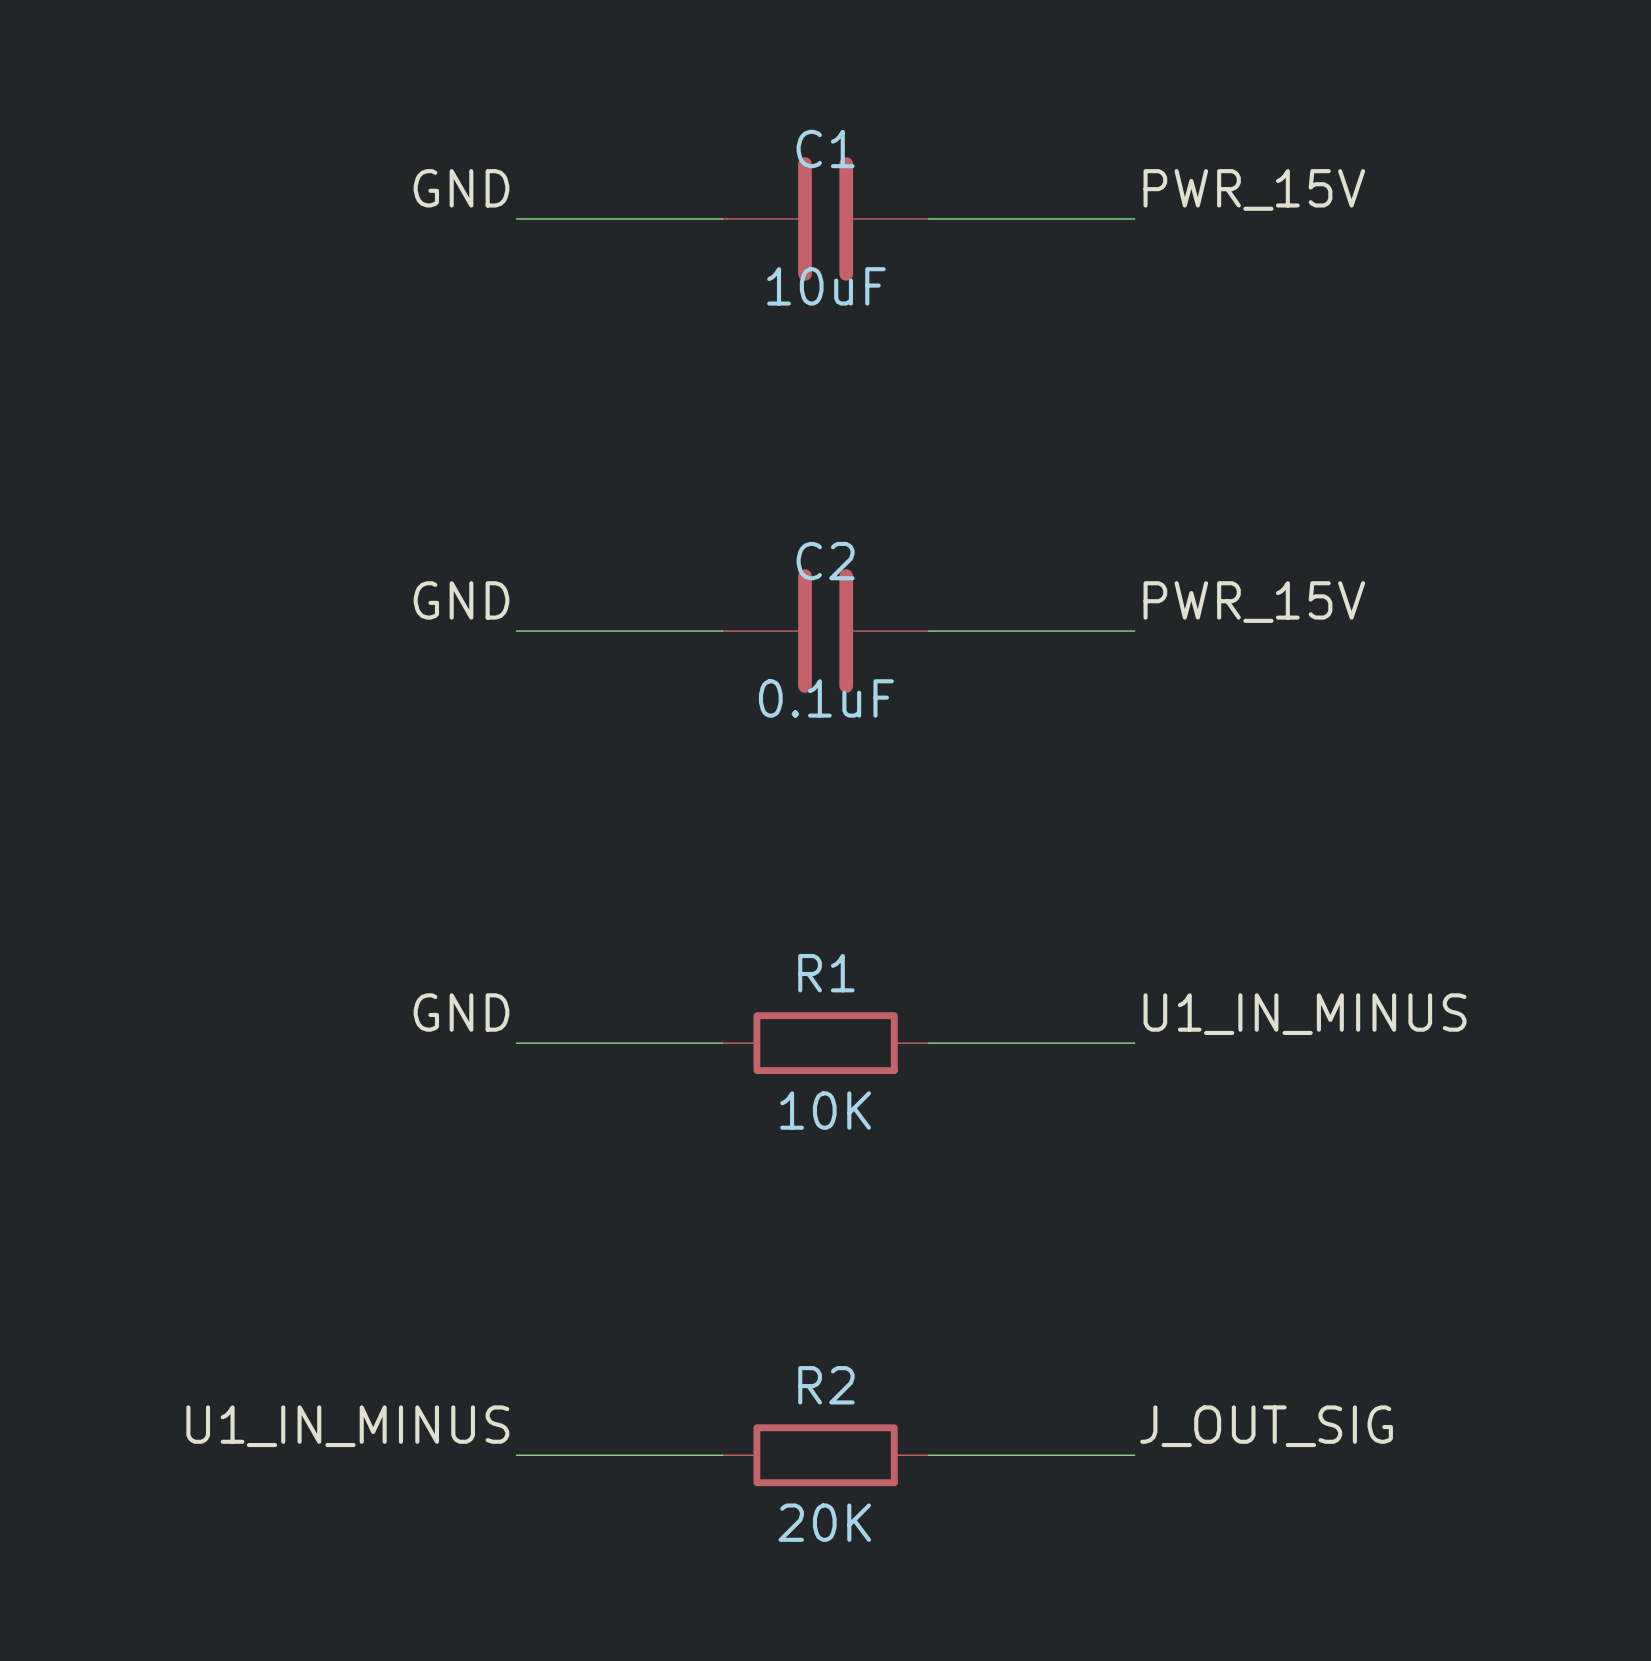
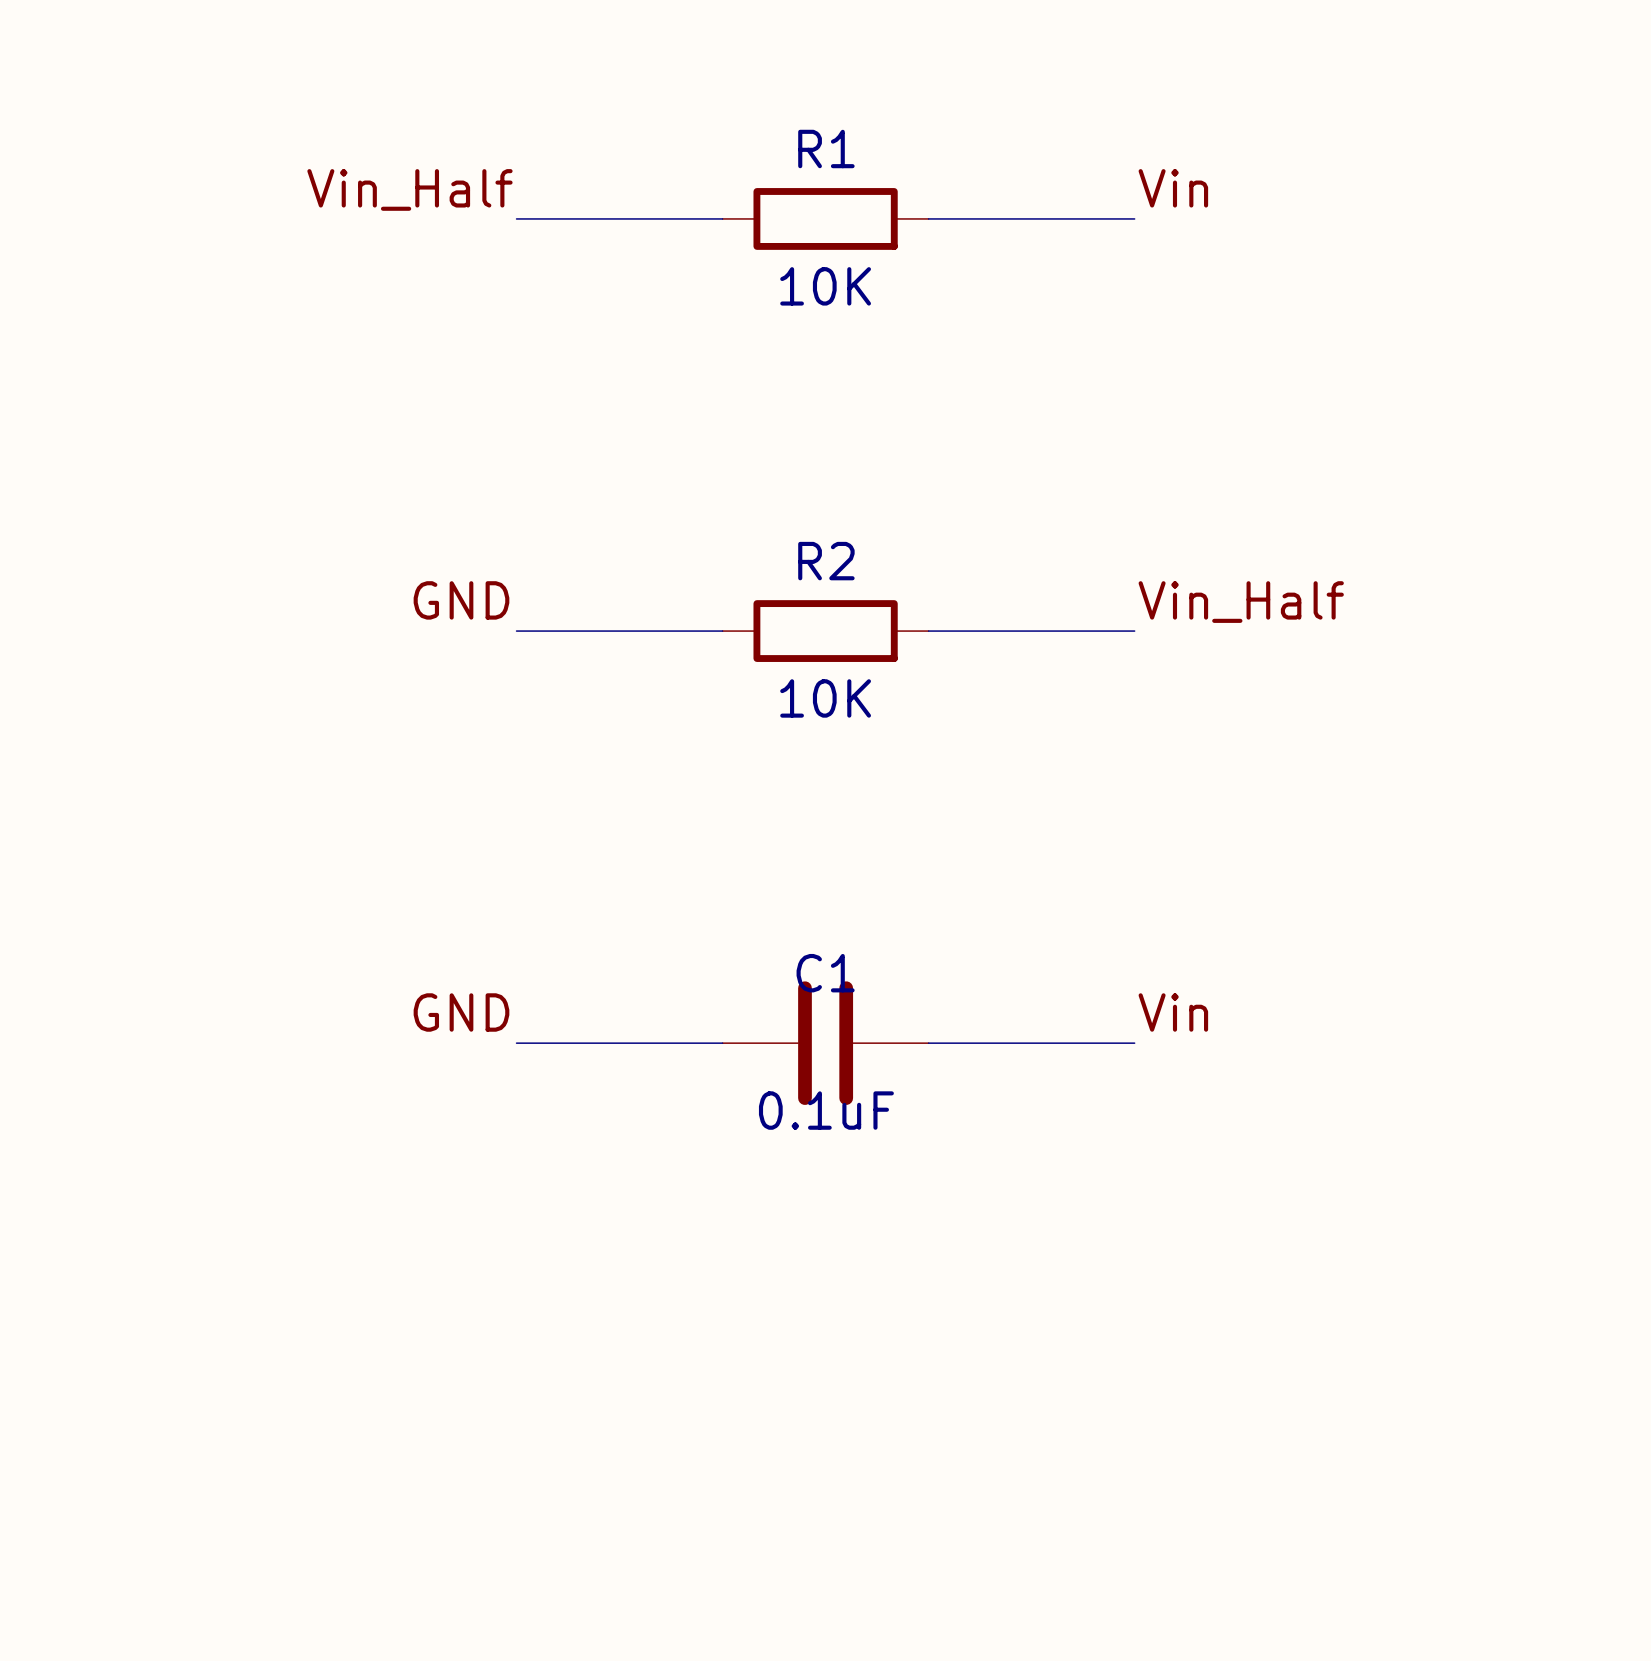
label: GND (461, 188) -> Vin_Half (409, 189)
label: PWR_15V (1254, 189) -> Vin (1173, 188)
C1 position: (825, 218) -> (825, 1043)
C1 value: 10uF (826, 286) -> 0.1uF (826, 1110)
label: PWR_15V (1254, 602) -> Vin_Half (1241, 602)
C2: 0.1uF (825, 631) -> none
label: U1_IN_MINUS (1304, 1014) -> Vin (1173, 1012)
R1 position: (825, 1043) -> (825, 218)
label: U1_IN_MINUS (347, 1426) -> none
label: J_OUT_SIG (1266, 1426) -> none
wire: (516, 1455) (722, 1455) -> none
R2 position: (825, 1455) -> (825, 631)
wire: (928, 1455) (1134, 1455) -> none
R2 value: 20K (824, 1522) -> 10K (825, 698)

